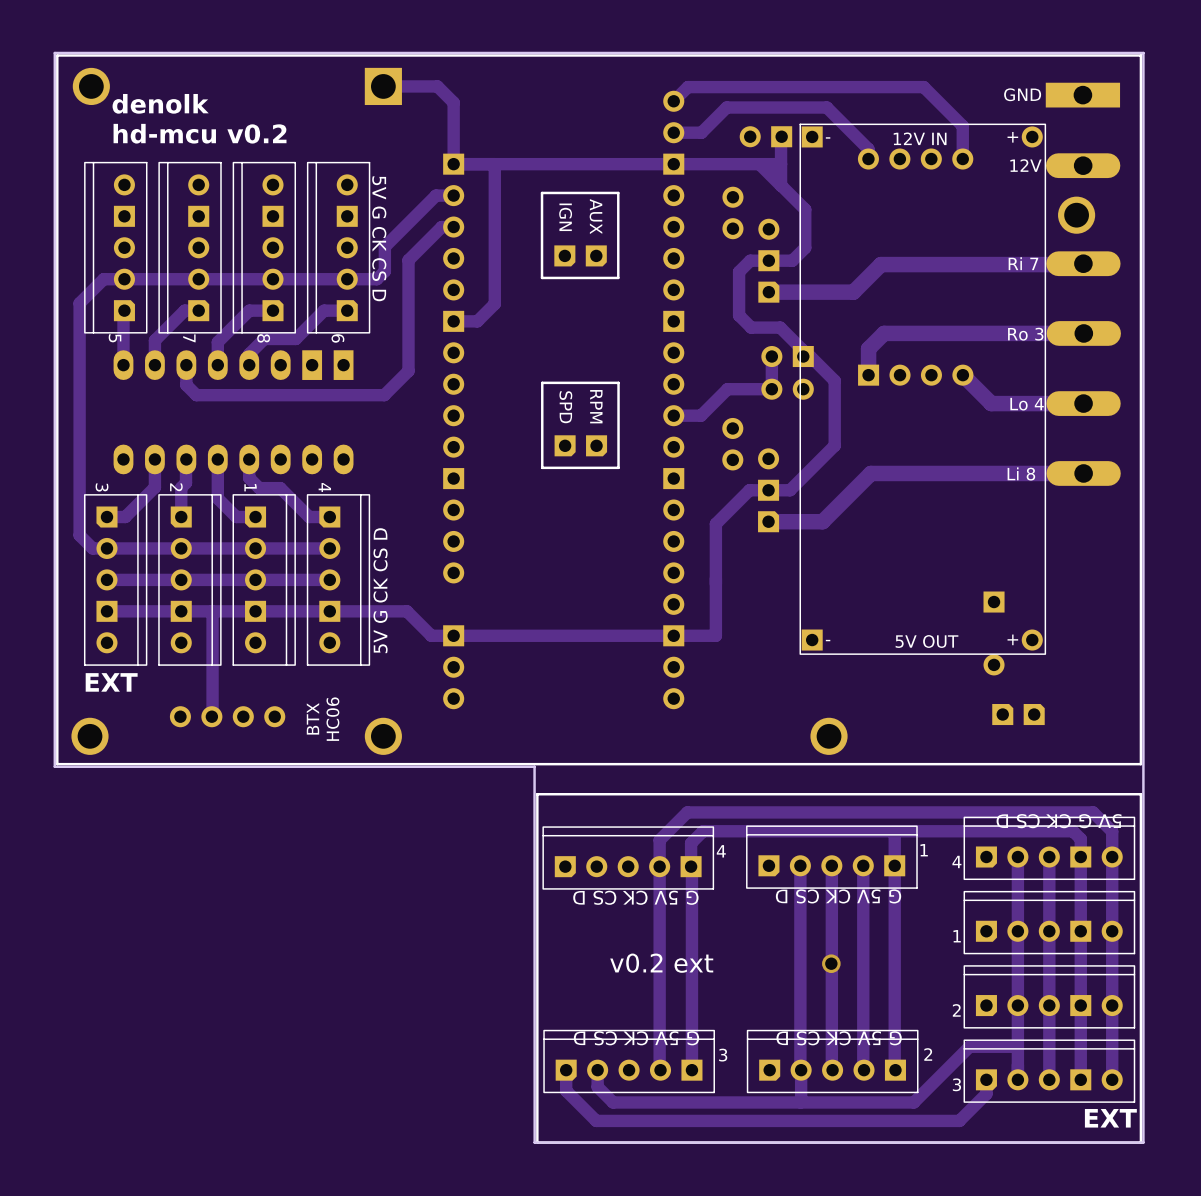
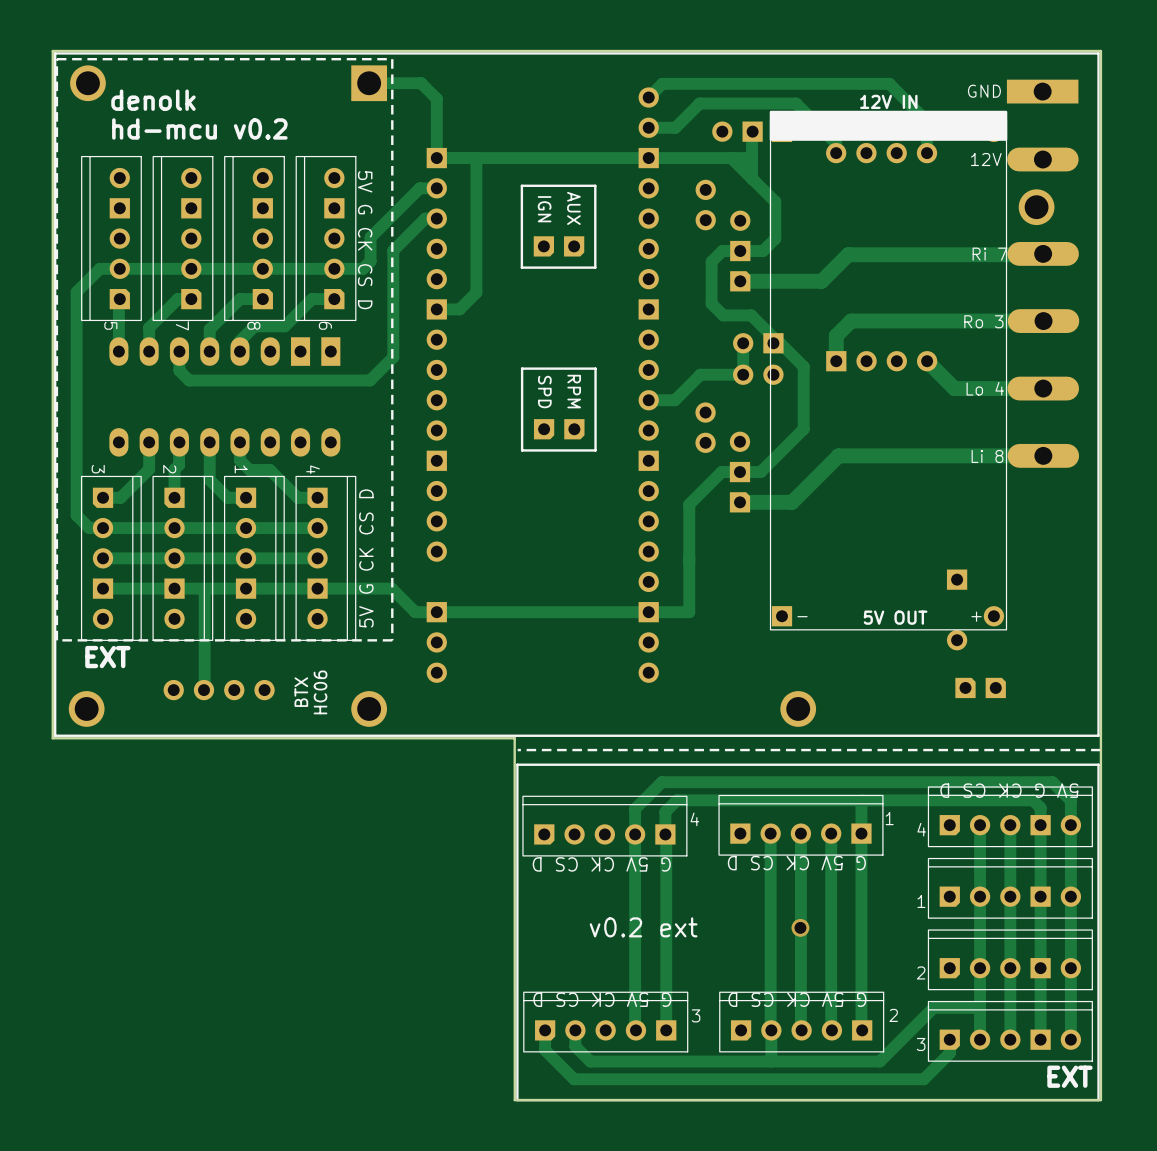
line: none -> (392, 59) (56, 59) (56, 640) (392, 640) (392, 59)
drawing: none -> [769, 110, 1008, 141]
part footprint: [799, 123, 1046, 655] -> [769, 119, 1008, 631]
line: none -> (1100, 750) (517, 750)

